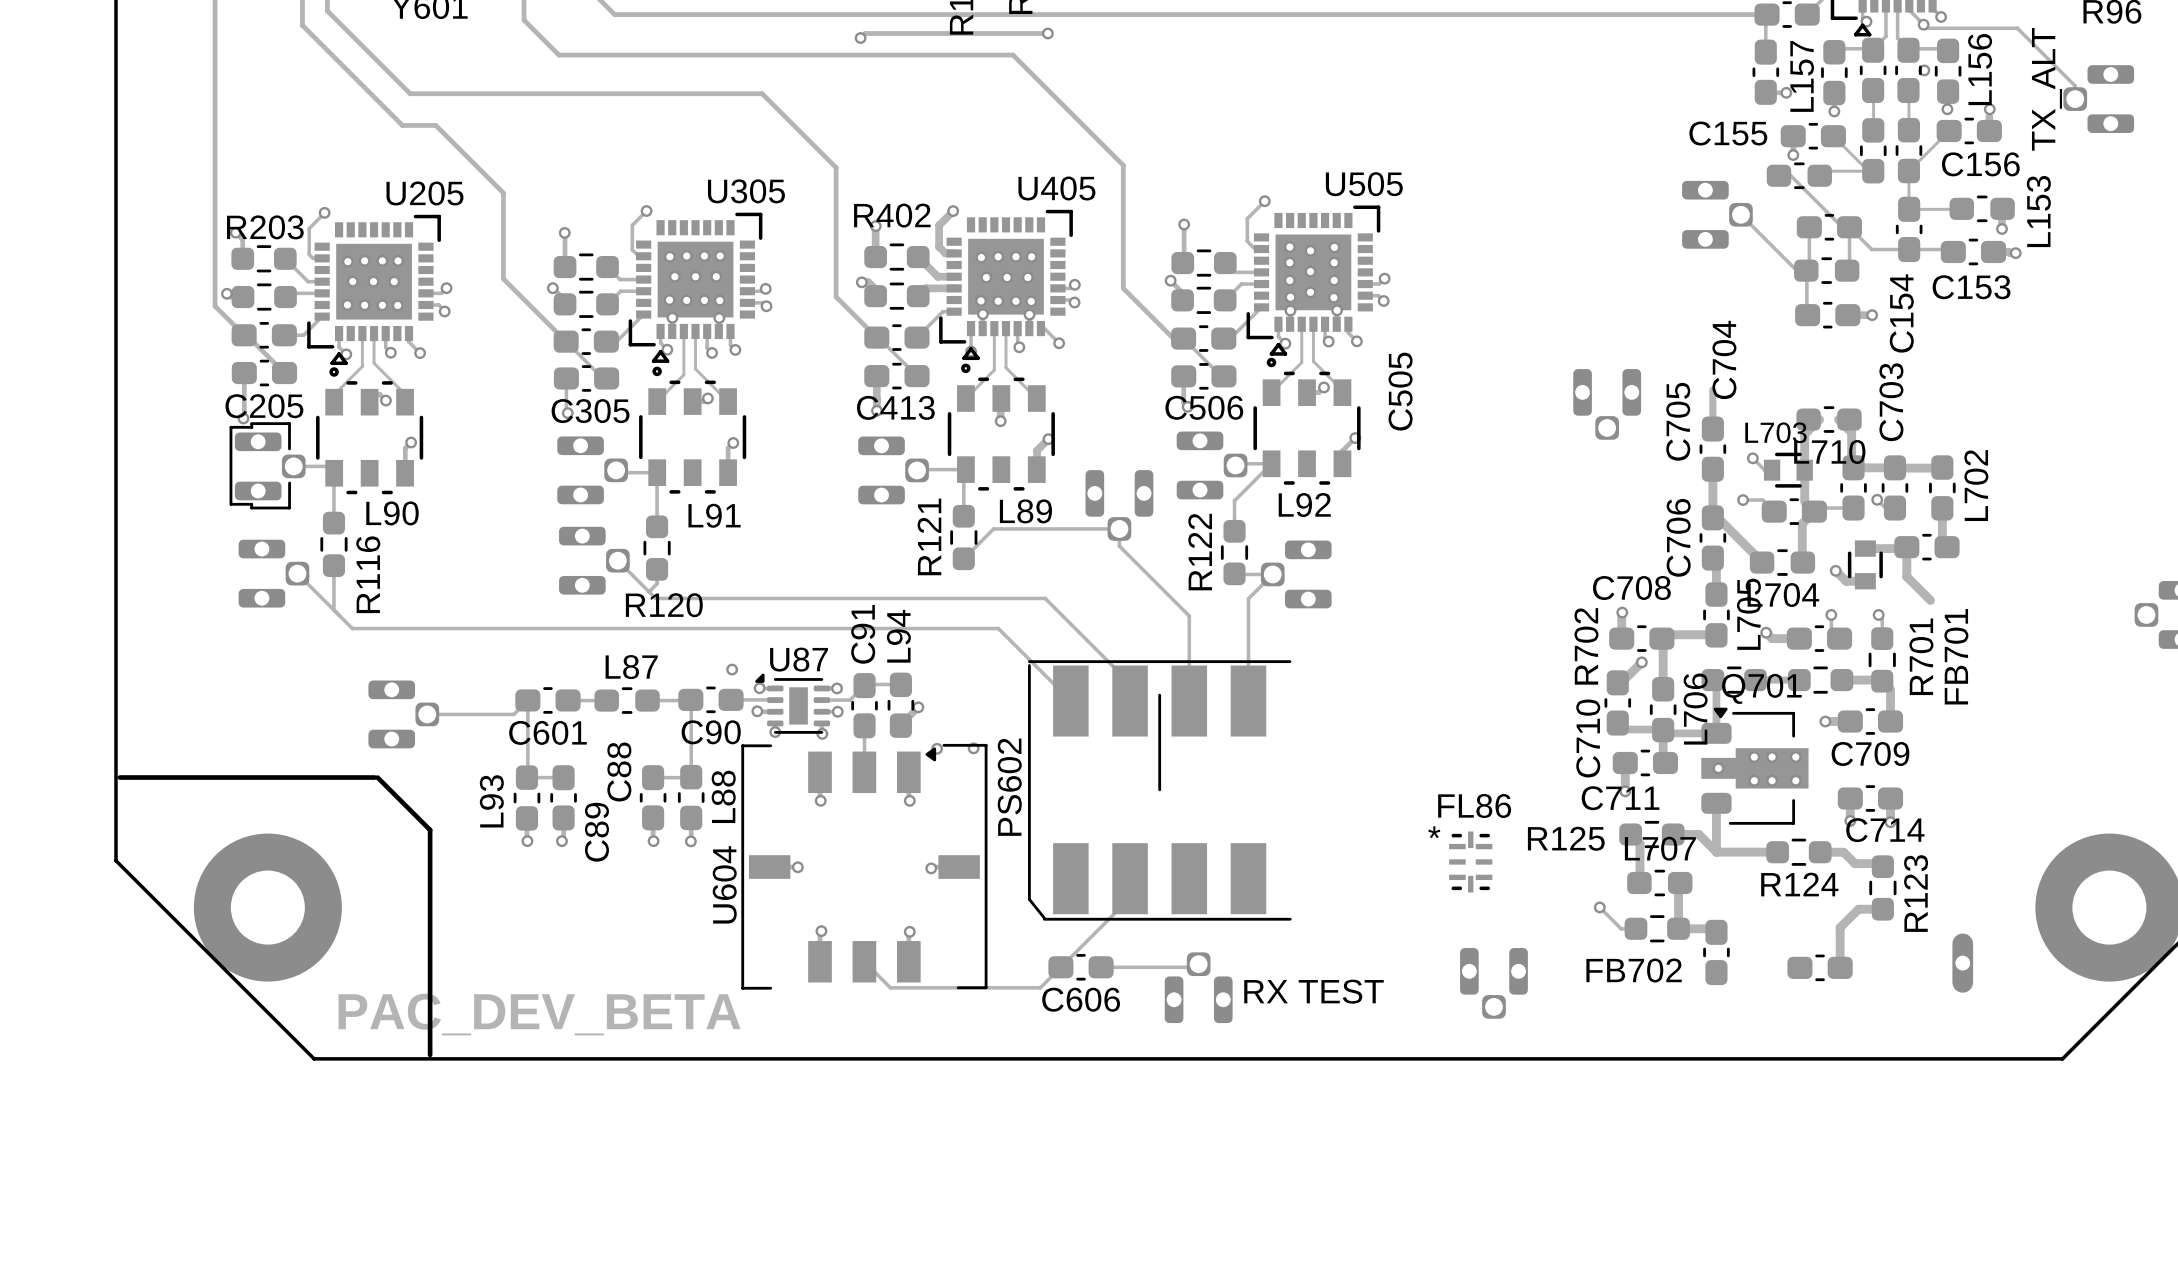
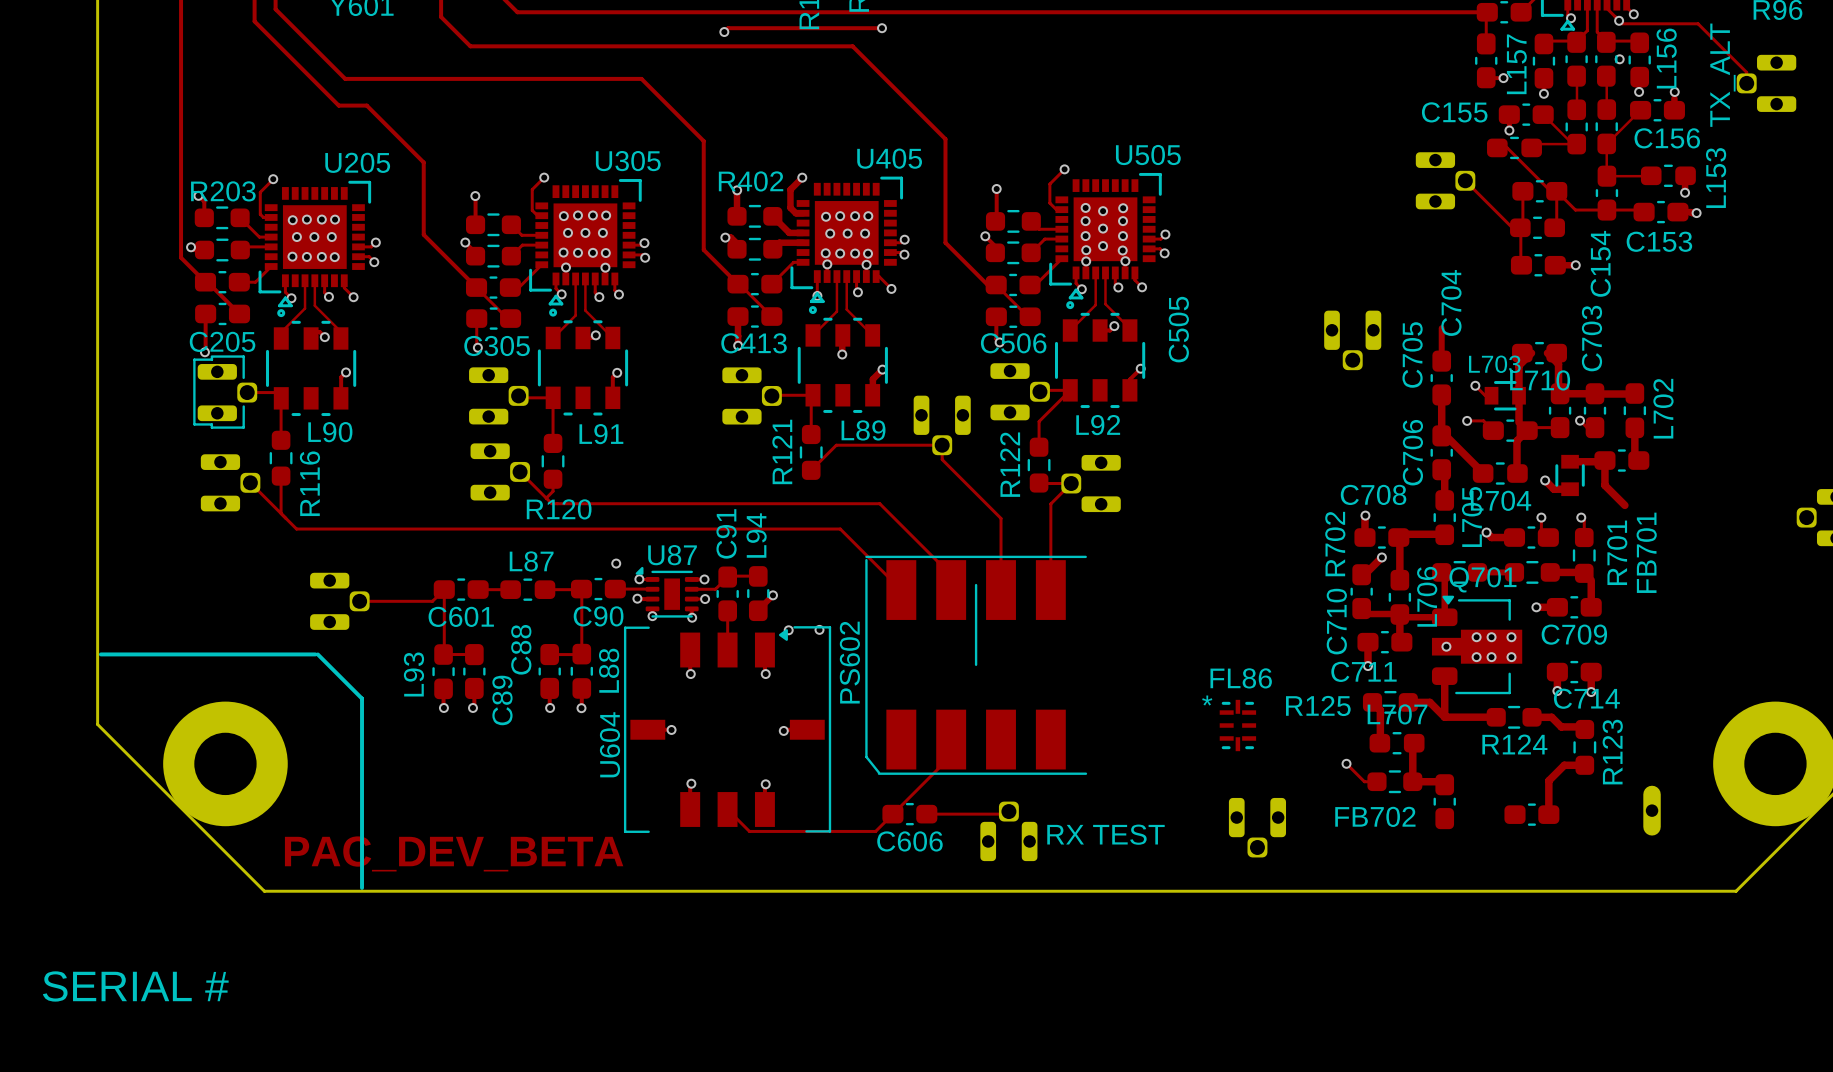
text: none -> SERIAL # (135, 986)

